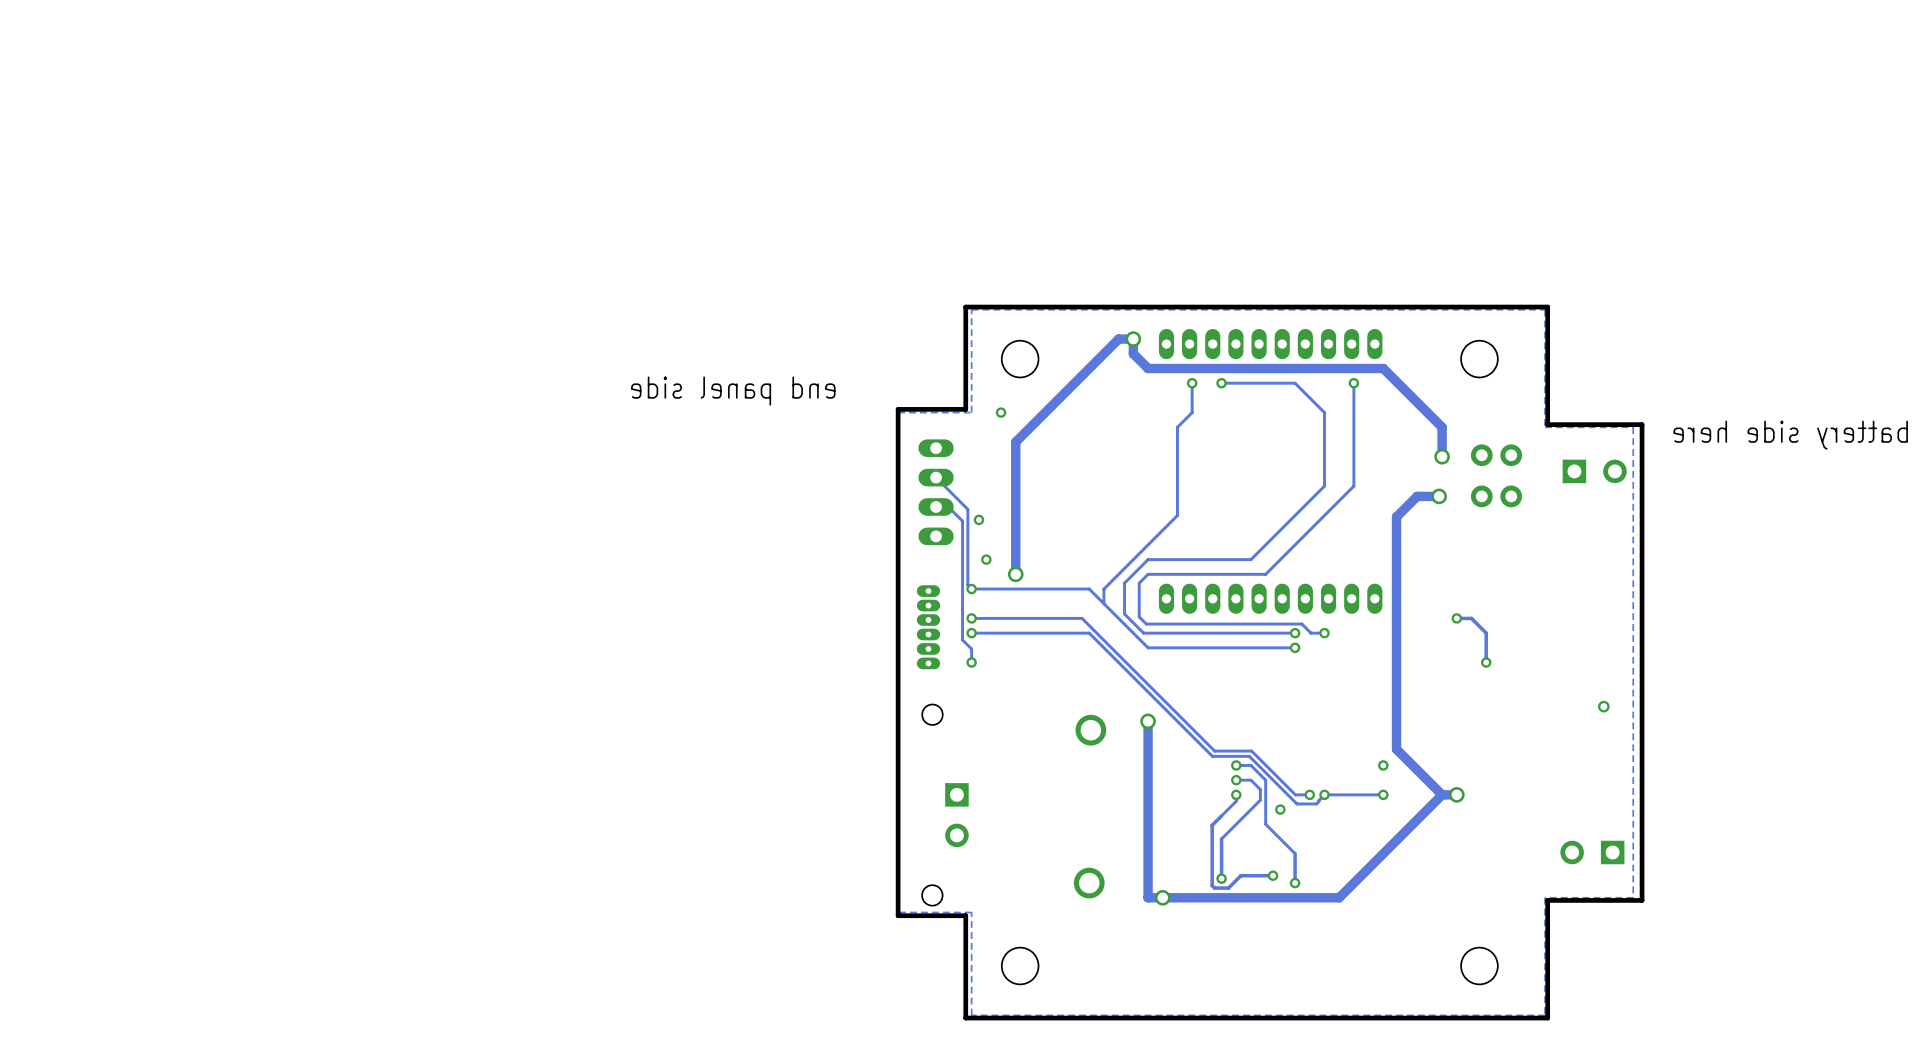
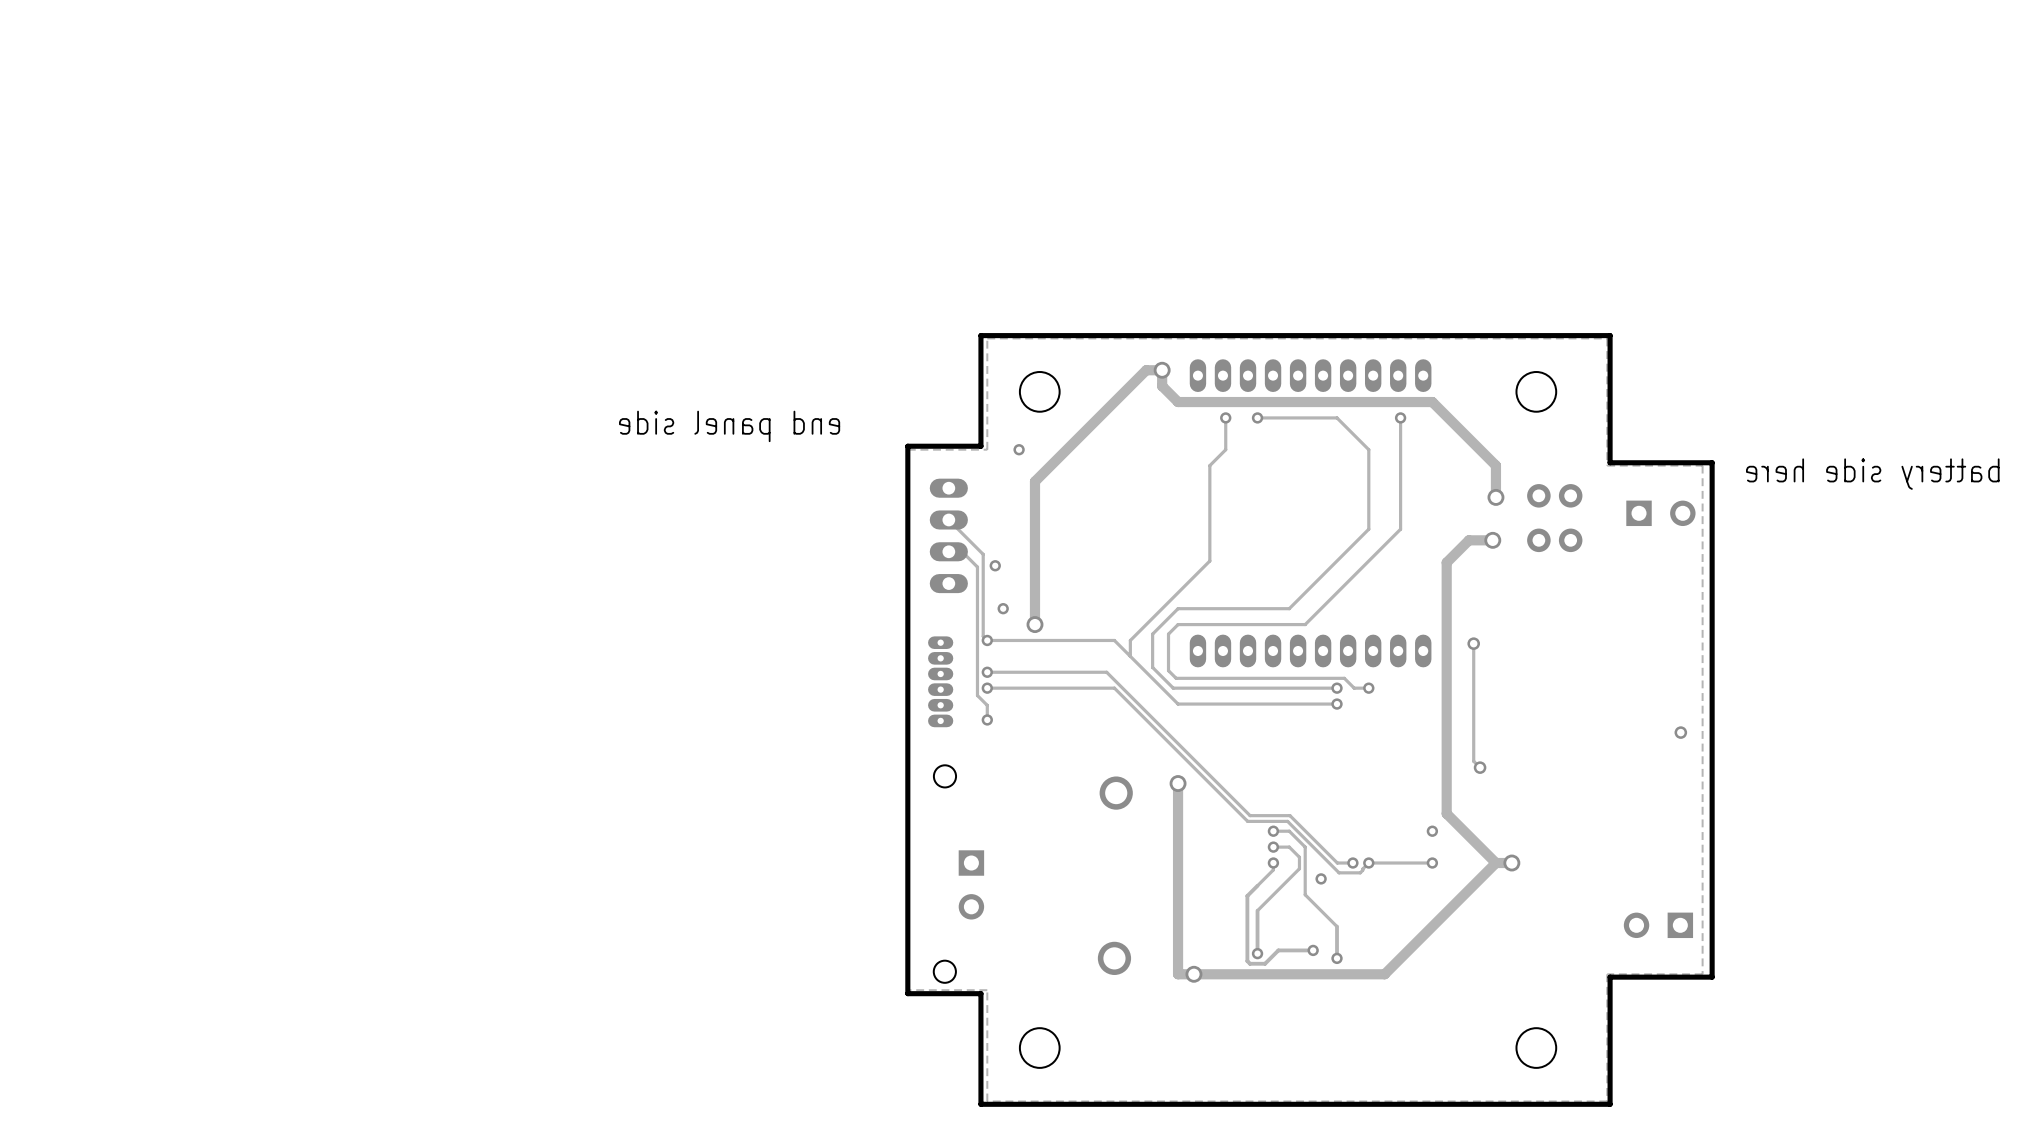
track: none -> (1473, 643) (1473, 761) (1480, 767)
via: none -> (1473, 643)
track: (1456, 618) (1471, 618) (1486, 633) (1486, 662) -> none
via: (1456, 618) -> none
via: (1486, 662) -> none
via: none -> (1480, 767)
via position: (1603, 706) -> (1680, 732)

